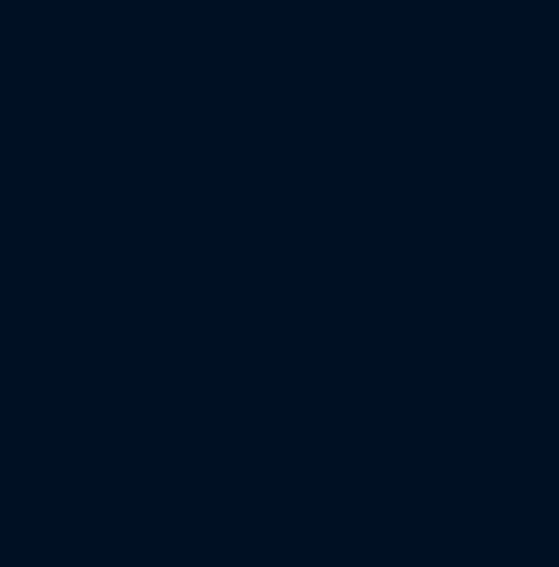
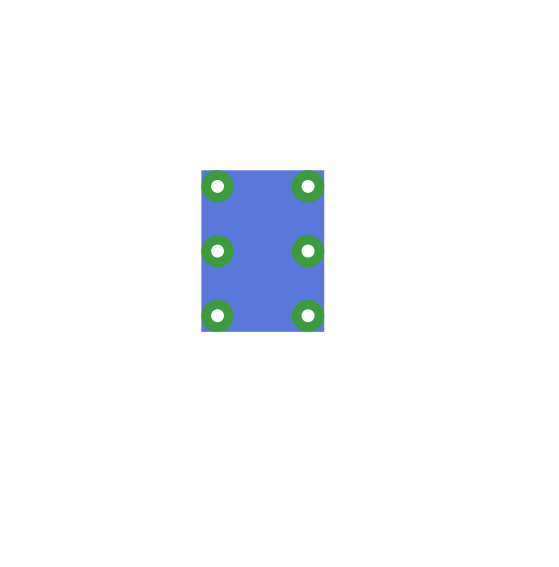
part: none -> (262, 251)

